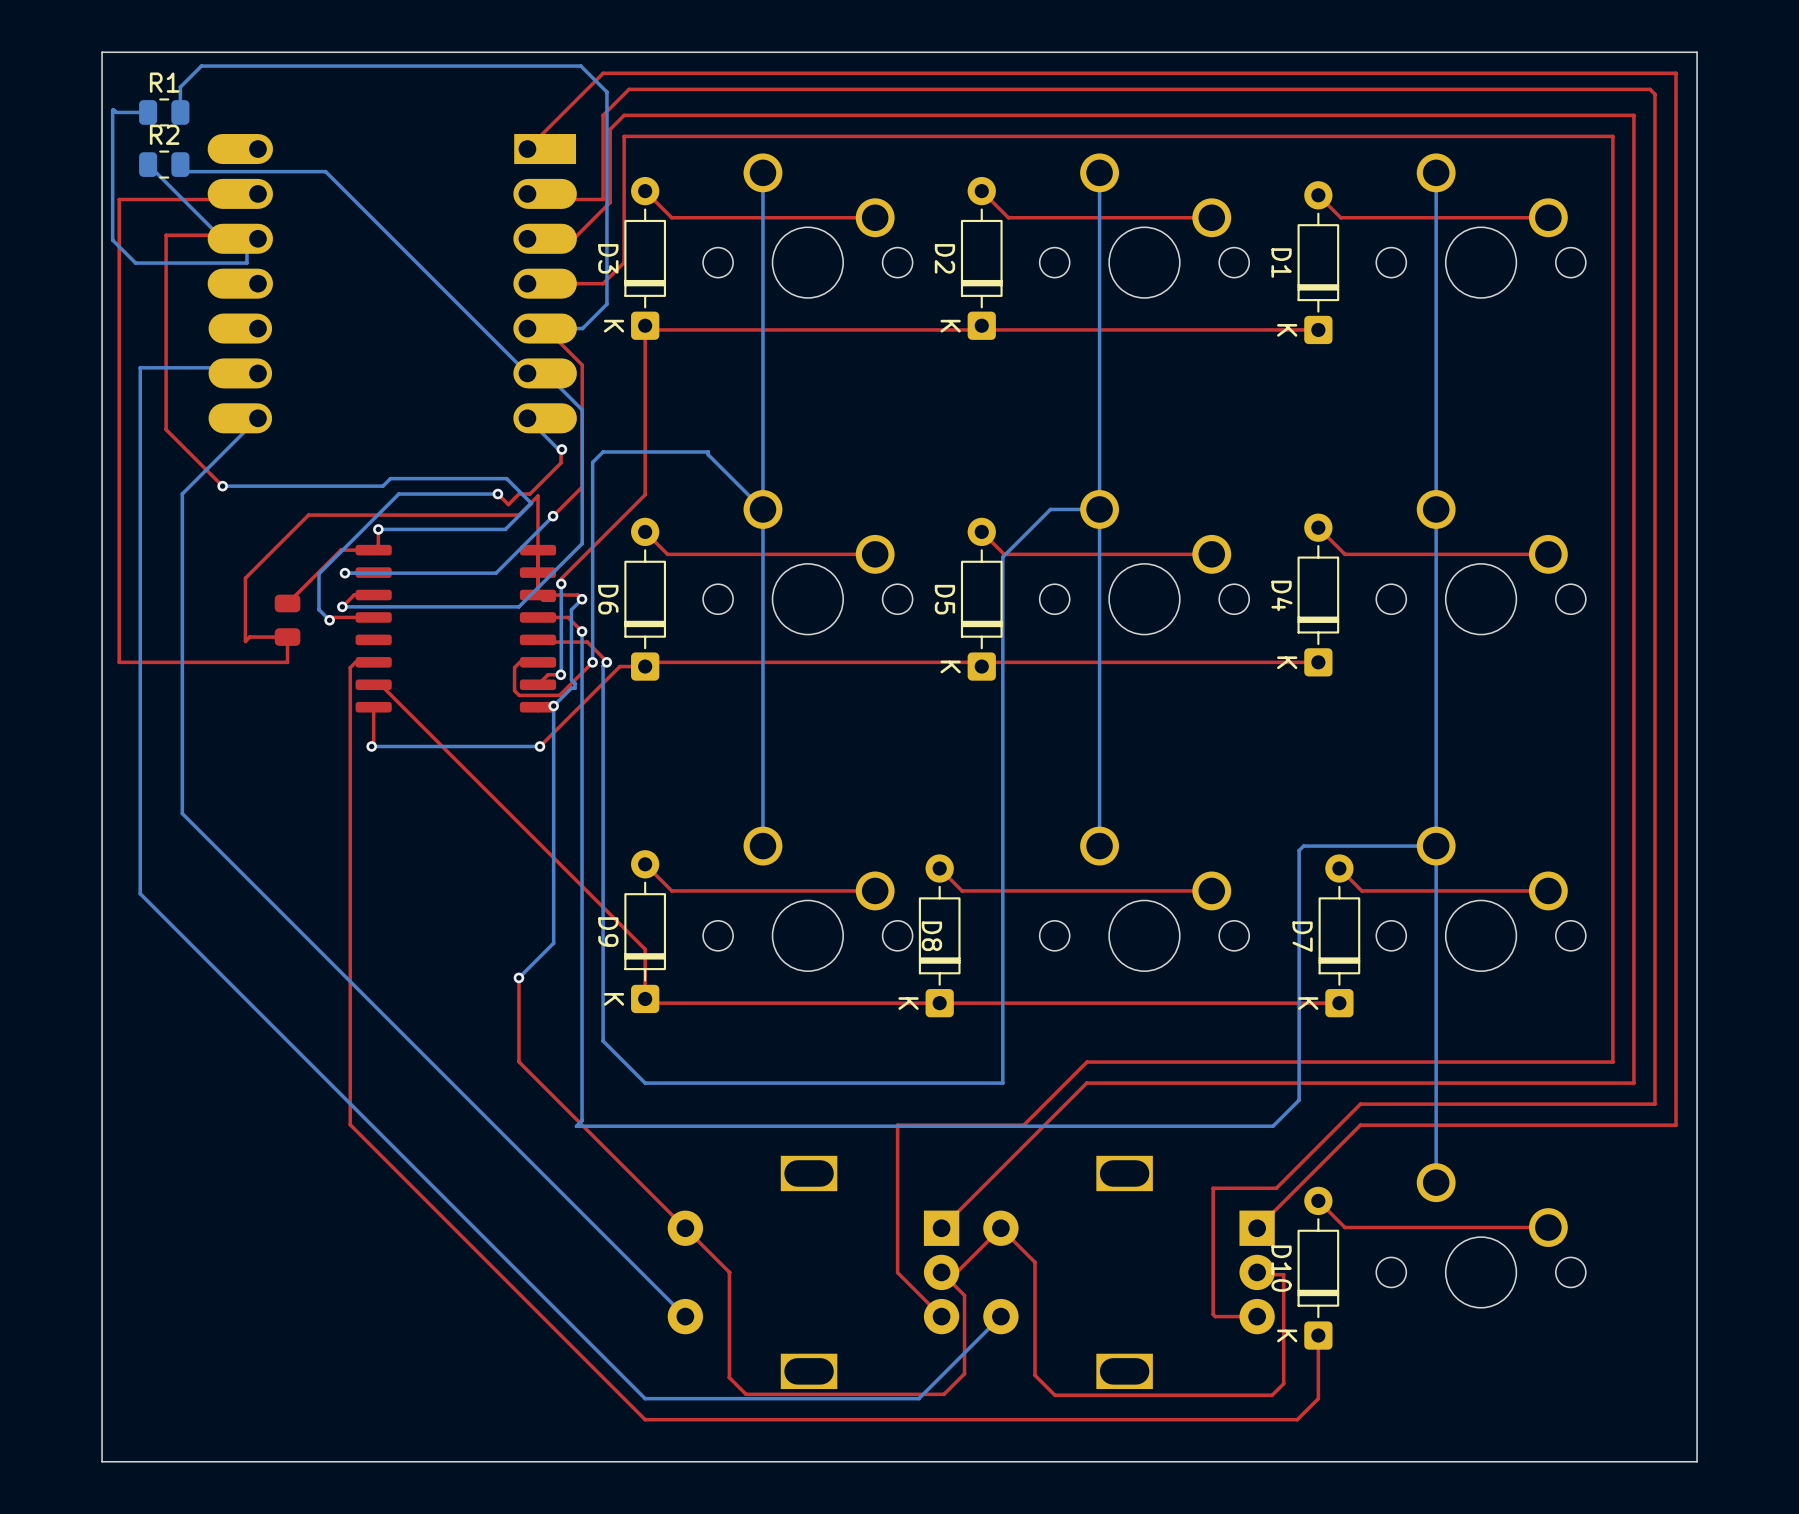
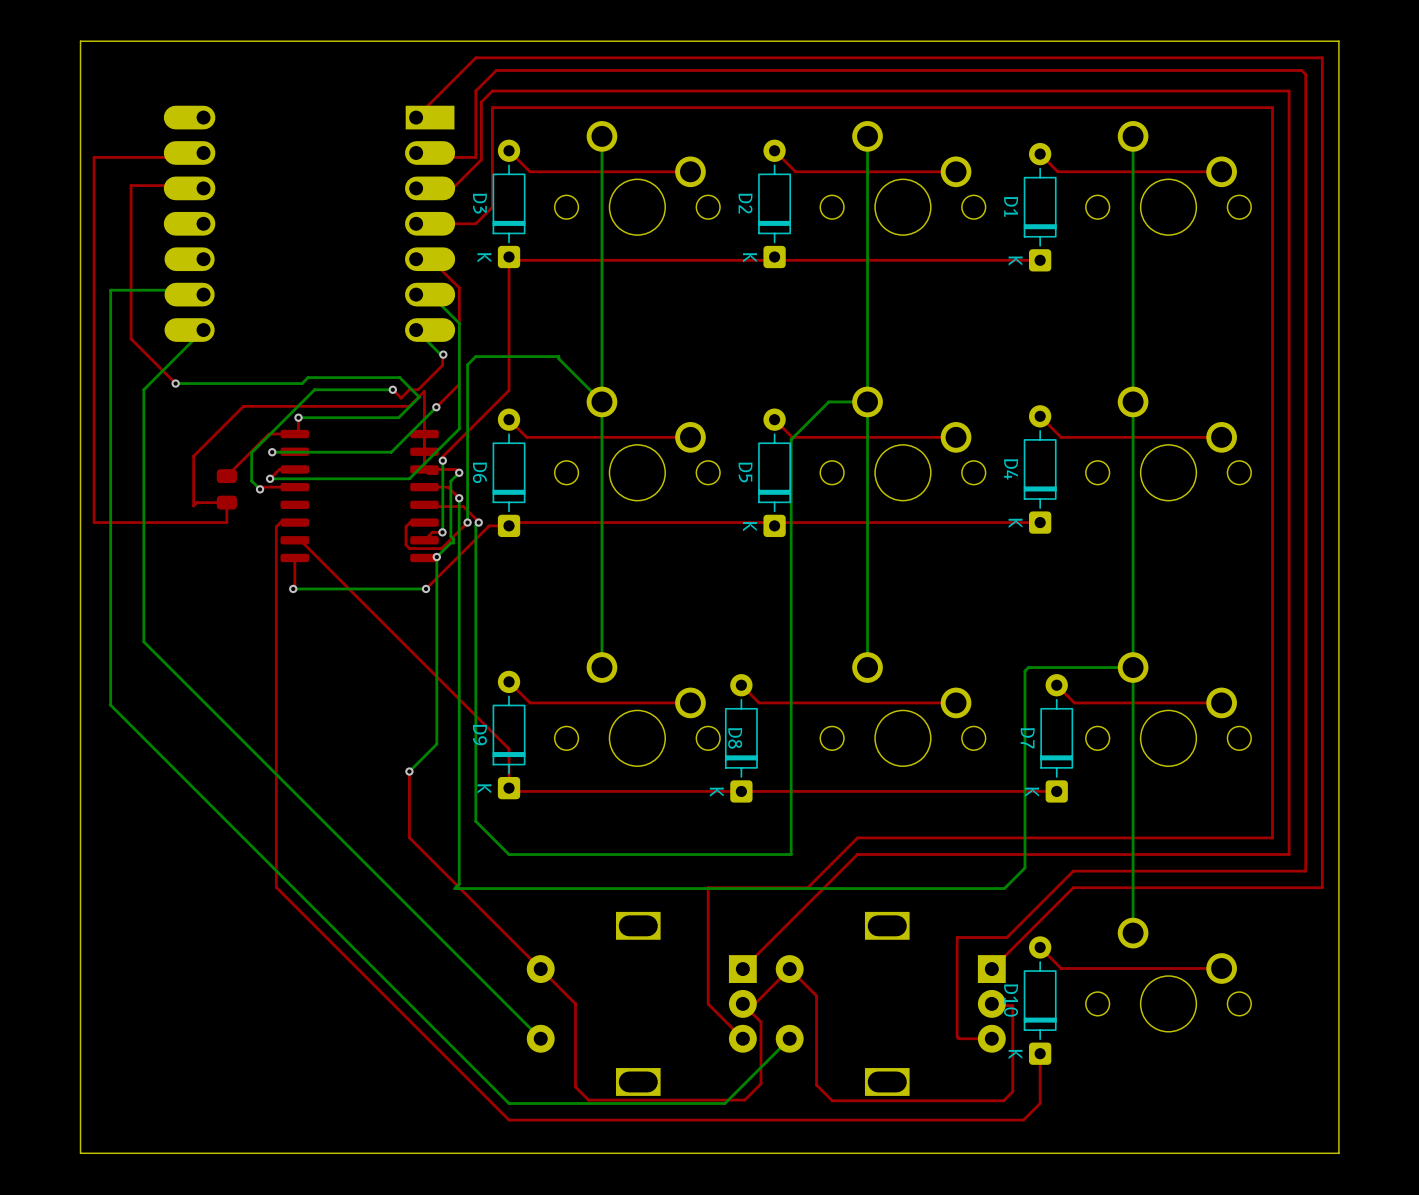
bottom track: (148, 112) (116, 112) (112, 110) (112, 240) (135, 263) (246, 263) (246, 249) (257, 238) (222, 238) (148, 164) -> none
R1: (164, 112) -> none
bottom track: (180, 112) (180, 87) (201, 66) (580, 66) (606, 92) (606, 304) (582, 328) (527, 328) -> none
R2: (164, 164) -> none
bottom track: (180, 164) (187, 171) (325, 171) (527, 373) -> none

